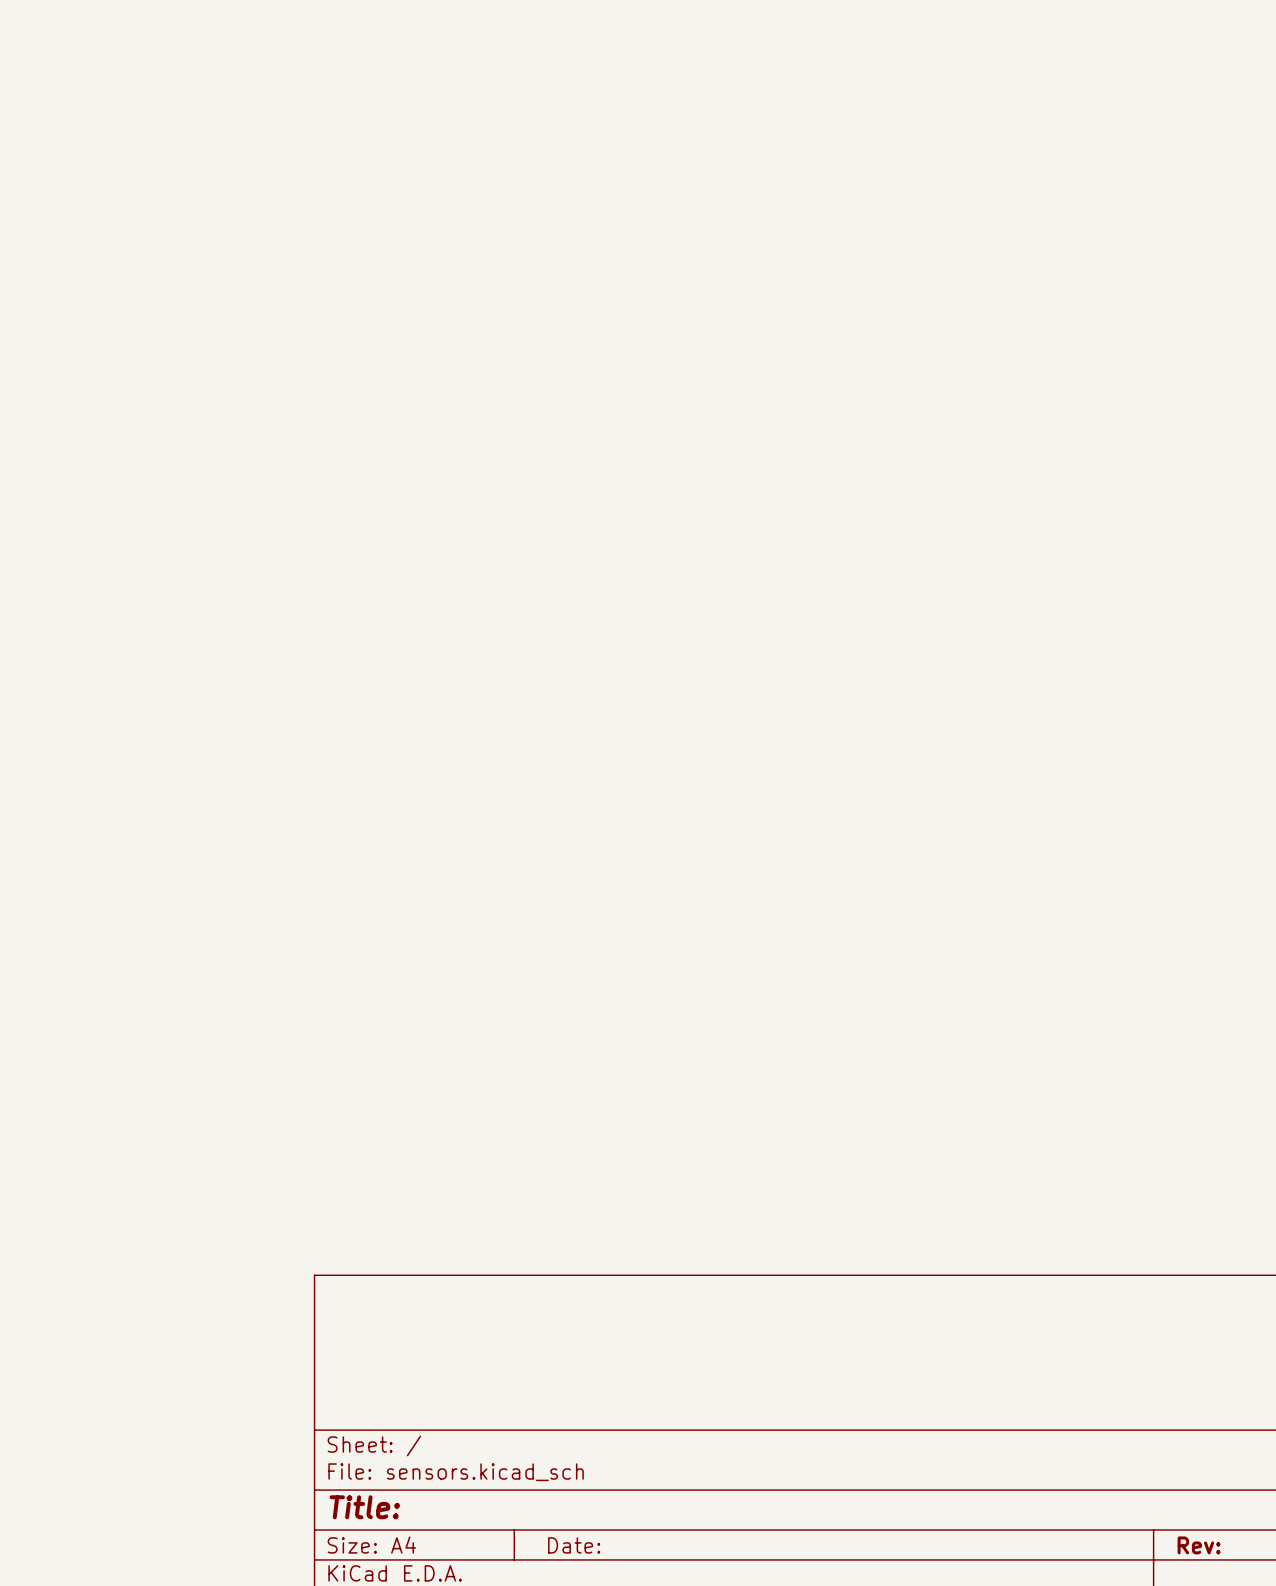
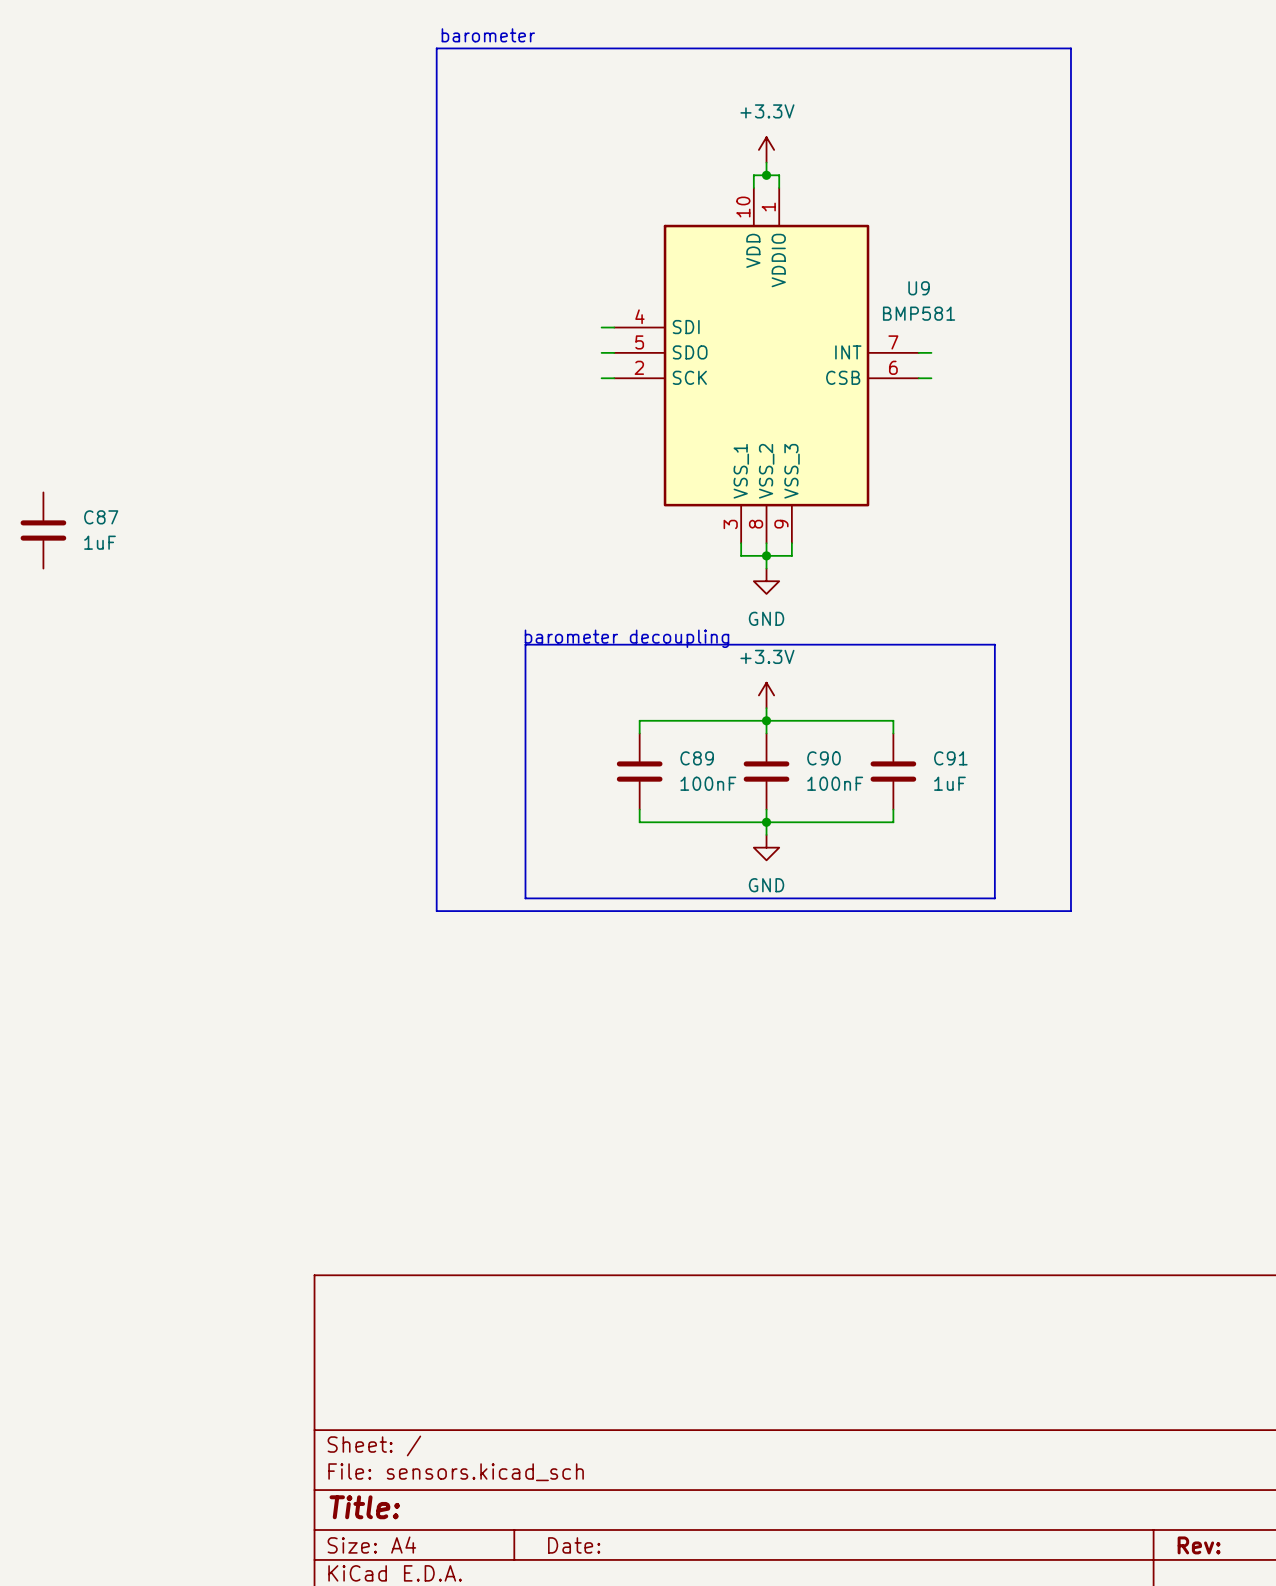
text: none -> barometer (488, 35)
line: none -> (436, 48) (1070, 48) (1070, 911) (436, 911) (436, 48)
power symbol: none -> +3.3V (766, 149)
wire: none -> (766, 162) (766, 175)
junction: none -> (766, 175)
wire: none -> (753, 187) (753, 175) (779, 175) (779, 187)
wire: none -> (601, 327) (614, 327)
wire: none -> (601, 352) (614, 352)
wire: none -> (918, 352) (931, 352)
U9: none -> BMP581 (766, 365)
wire: none -> (601, 378) (614, 378)
wire: none -> (918, 378) (931, 378)
C87: none -> 1uF (43, 530)
wire: none -> (741, 543) (741, 555) (791, 555) (791, 543)
wire: none -> (766, 543) (766, 568)
junction: none -> (766, 555)
power symbol: none -> GND (766, 581)
text: none -> barometer decoupling (626, 638)
line: none -> (525, 644) (994, 644) (994, 898) (525, 898) (525, 644)
power symbol: none -> +3.3V (766, 695)
wire: none -> (766, 708) (766, 733)
junction: none -> (766, 720)
wire: none -> (639, 733) (639, 720) (893, 720) (893, 733)
C89: none -> 100nF (639, 771)
C90: none -> 100nF (766, 771)
C91: none -> 1uF (893, 771)
wire: none -> (639, 809) (639, 822) (893, 822) (893, 809)
wire: none -> (766, 809) (766, 834)
junction: none -> (766, 822)
power symbol: none -> GND (766, 847)

